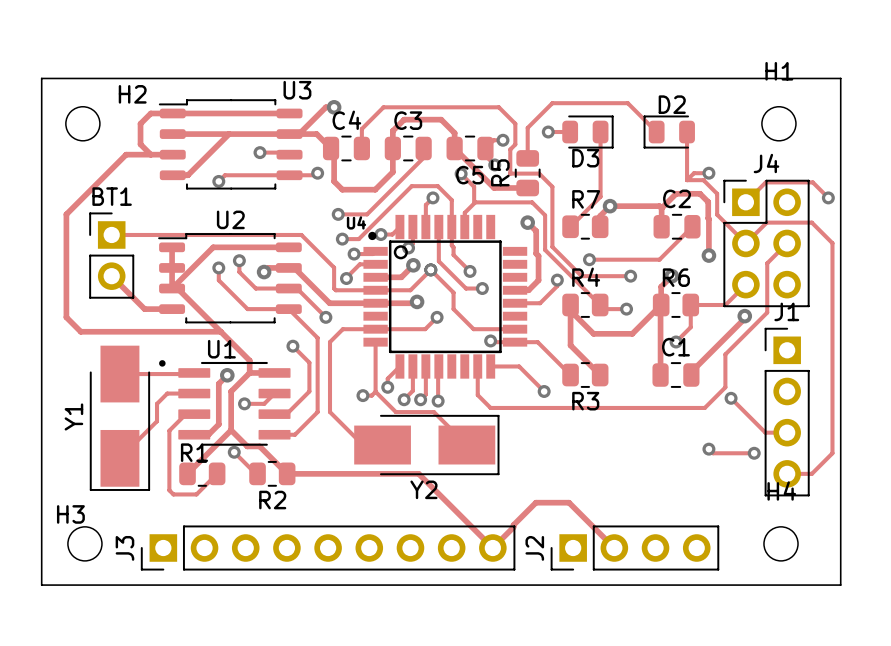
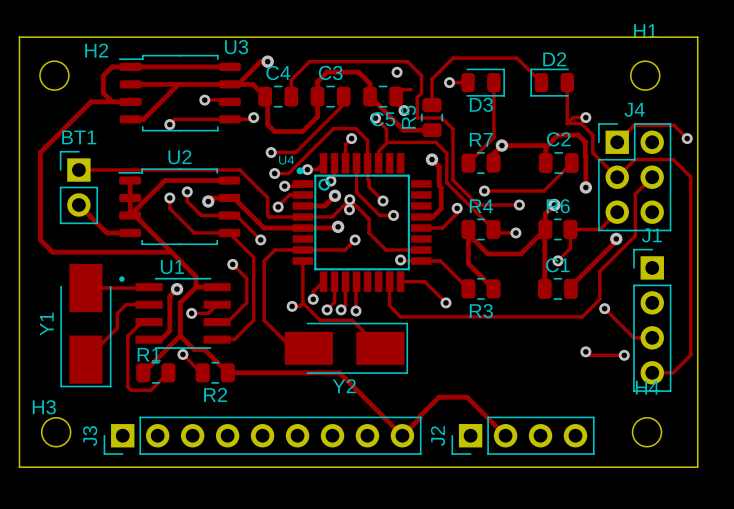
via position: (502, 140) -> (397, 72)
via: none -> (349, 209)

